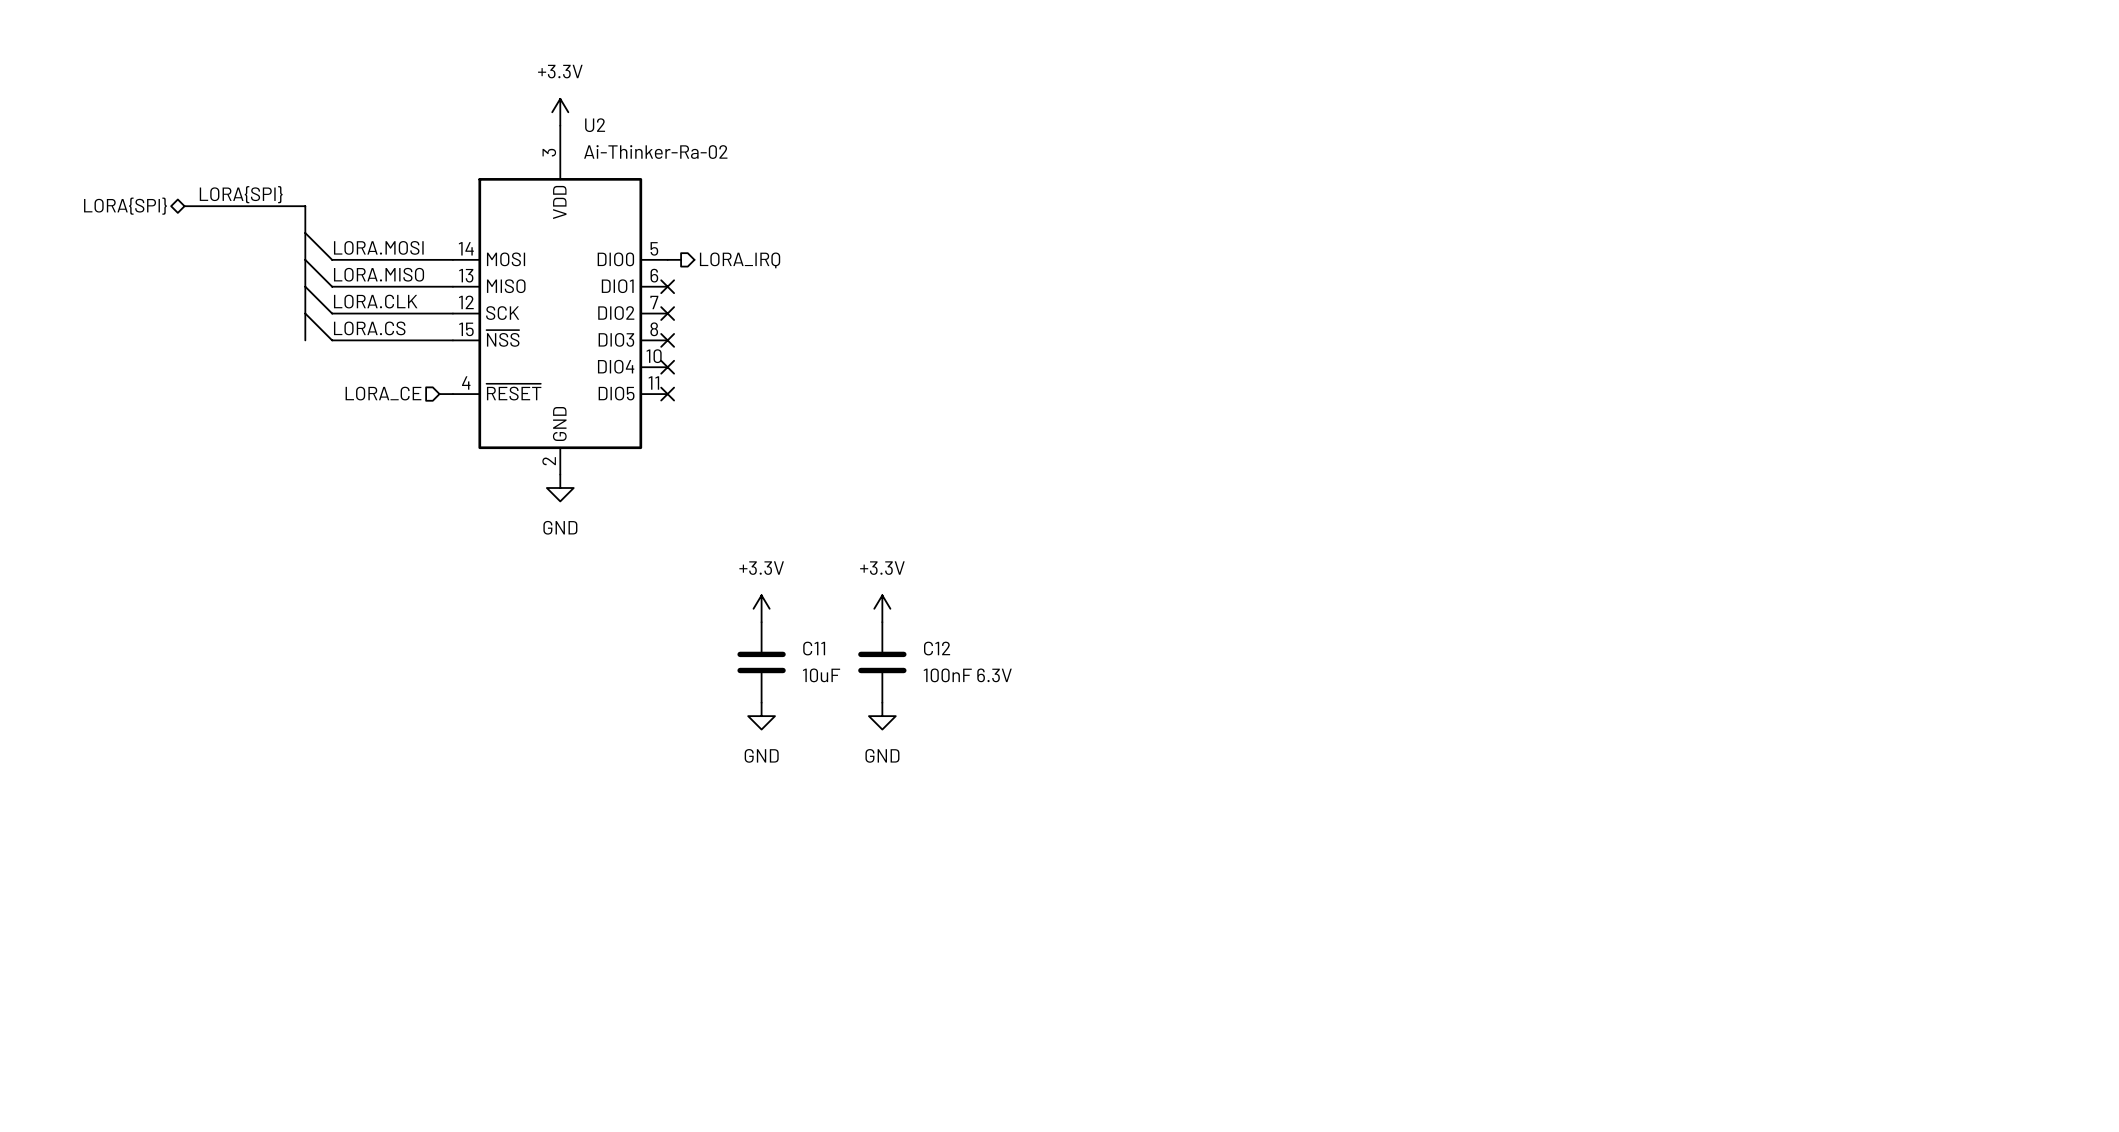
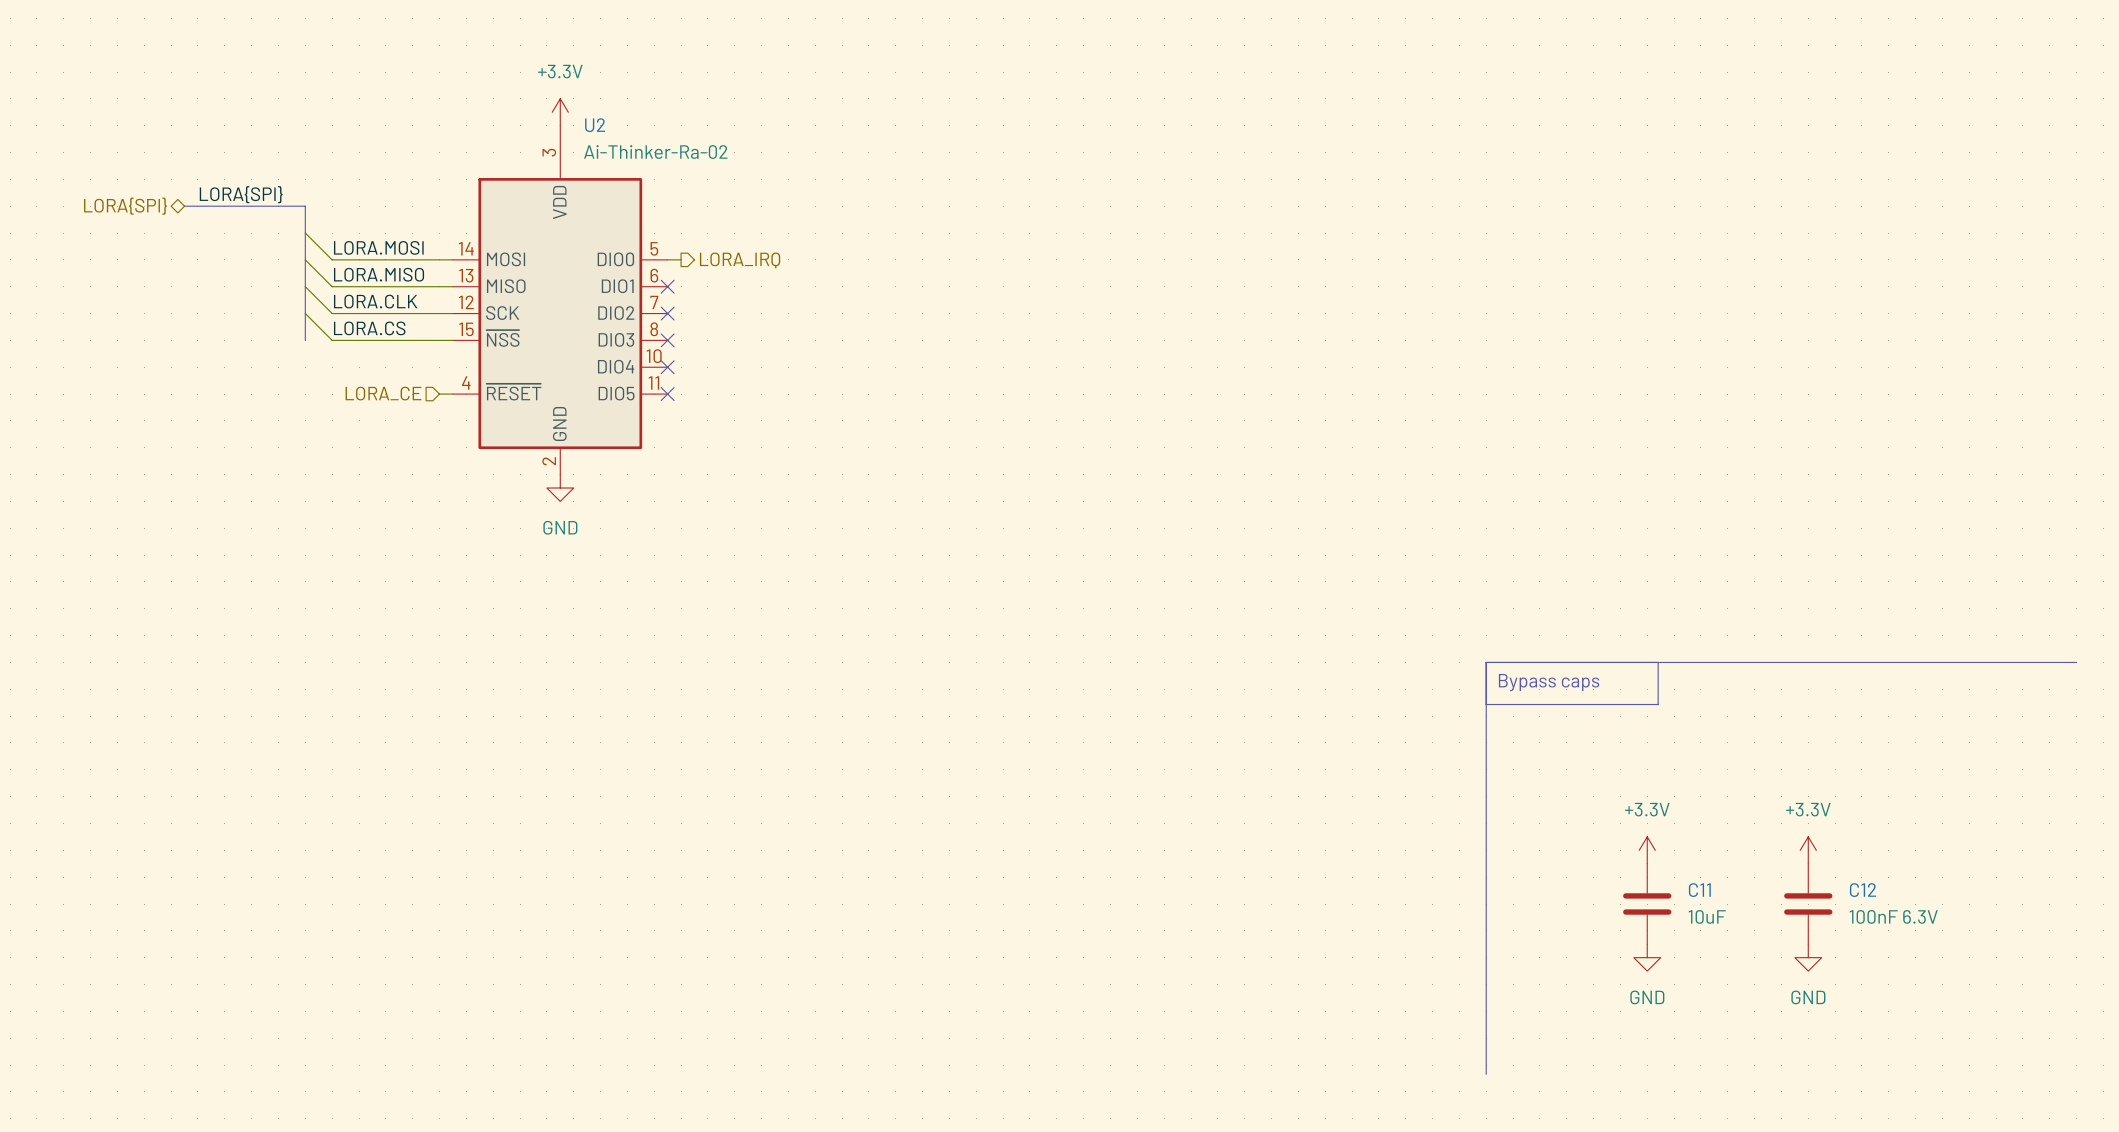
power symbol: +3.3V (761, 608) -> none
power symbol: +3.3V (882, 608) -> none
C11 position: (761, 662) -> (1647, 904)
C12 position: (882, 662) -> (1808, 904)
line: none -> (1658, 662) (1658, 704) (1486, 704)
line: none -> (2076, 662) (1486, 662) (1486, 1074)
text: none -> Bypass caps (1549, 682)
power symbol: GND (761, 716) -> none
power symbol: GND (882, 716) -> none
power symbol: none -> +3.3V (1647, 850)
power symbol: none -> +3.3V (1808, 850)
power symbol: none -> GND (1647, 957)
power symbol: none -> GND (1808, 957)

